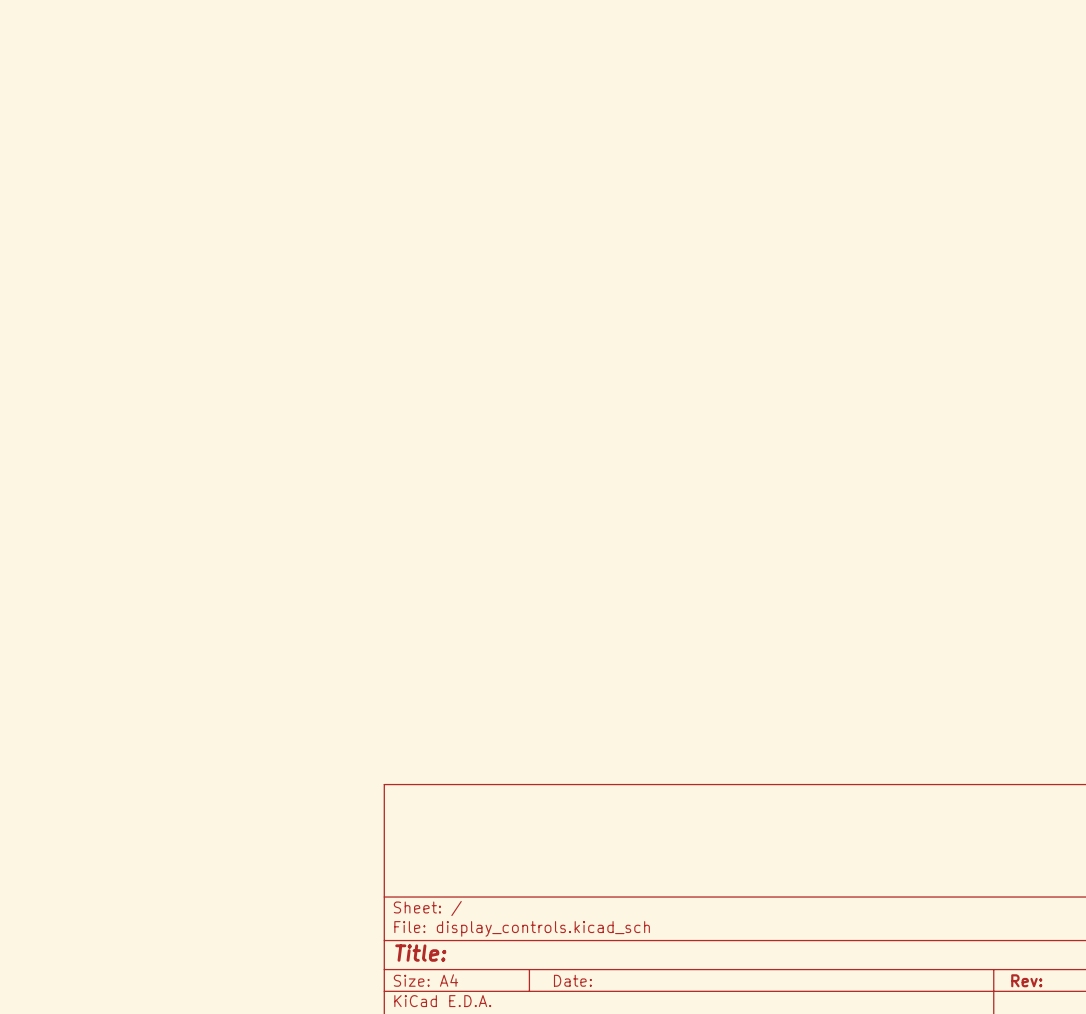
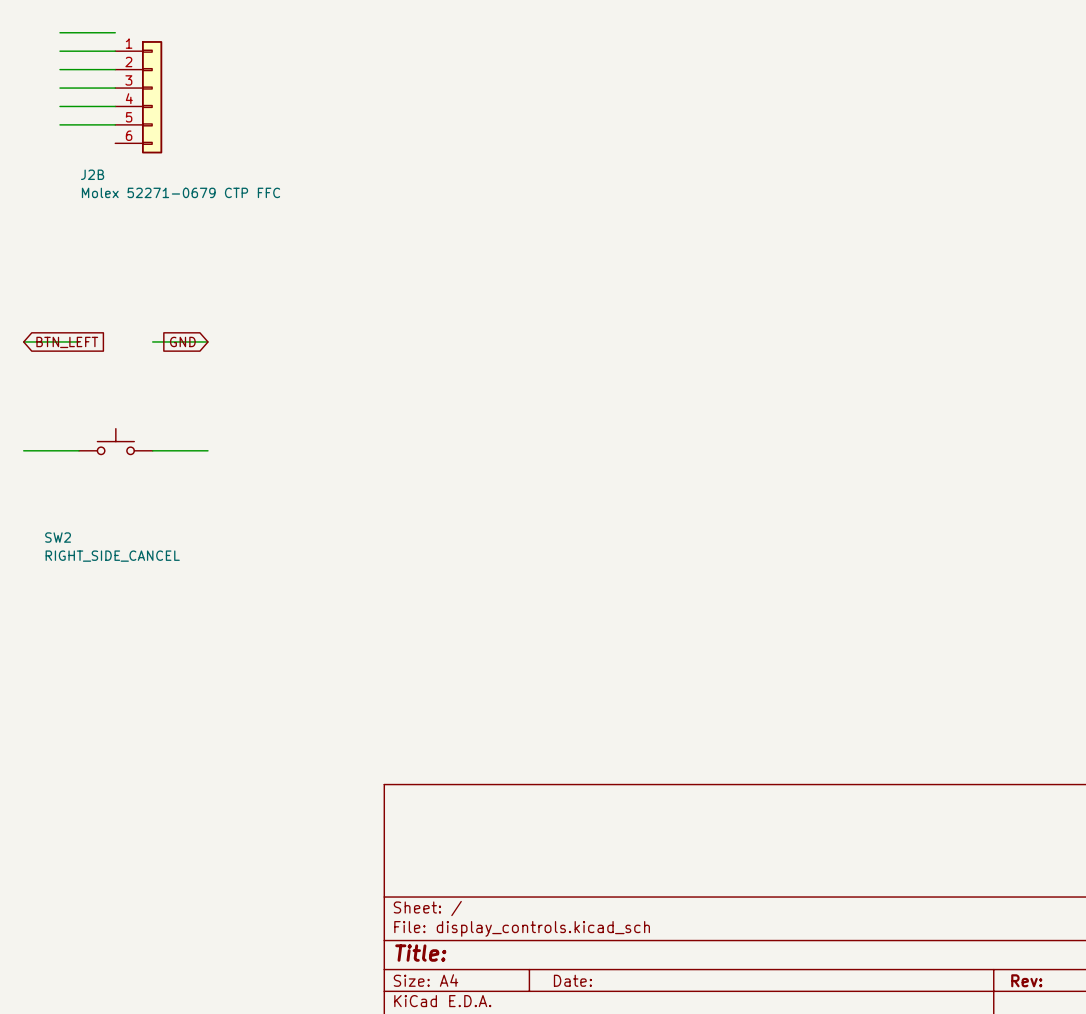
wire: none -> (59, 32) (115, 32)
wire: none -> (59, 51) (115, 51)
wire: none -> (59, 69) (115, 69)
wire: none -> (59, 88) (115, 88)
J2B: none -> Molex 52271-0679 CTP FFC (138, 97)
wire: none -> (59, 106) (115, 106)
wire: none -> (59, 124) (115, 124)
wire: none -> (23, 341) (78, 341)
wire: none -> (152, 341) (207, 341)
global label: none -> GND (182, 341)
global label: none -> BTN_LEFT (67, 342)
SW2: none -> RIGHT_SIDE_CANCEL (115, 441)
wire: none -> (23, 450) (78, 450)
wire: none -> (152, 450) (207, 450)

